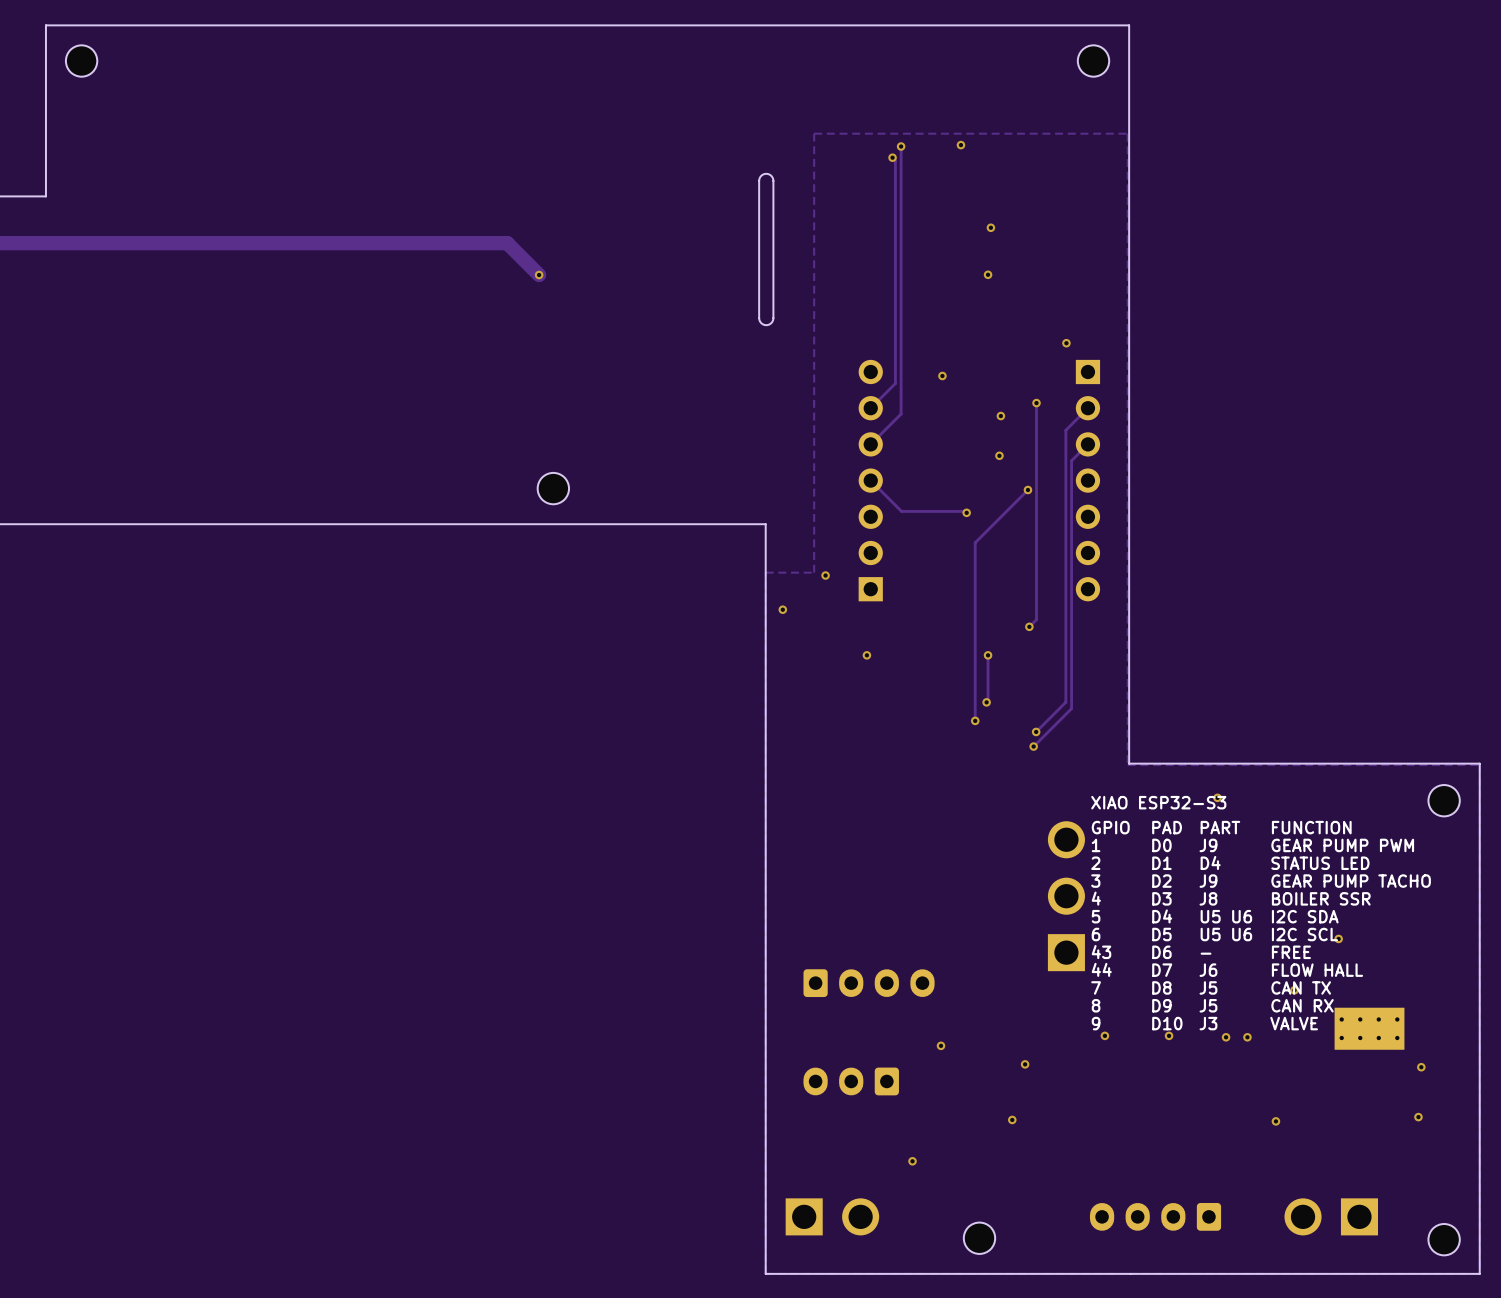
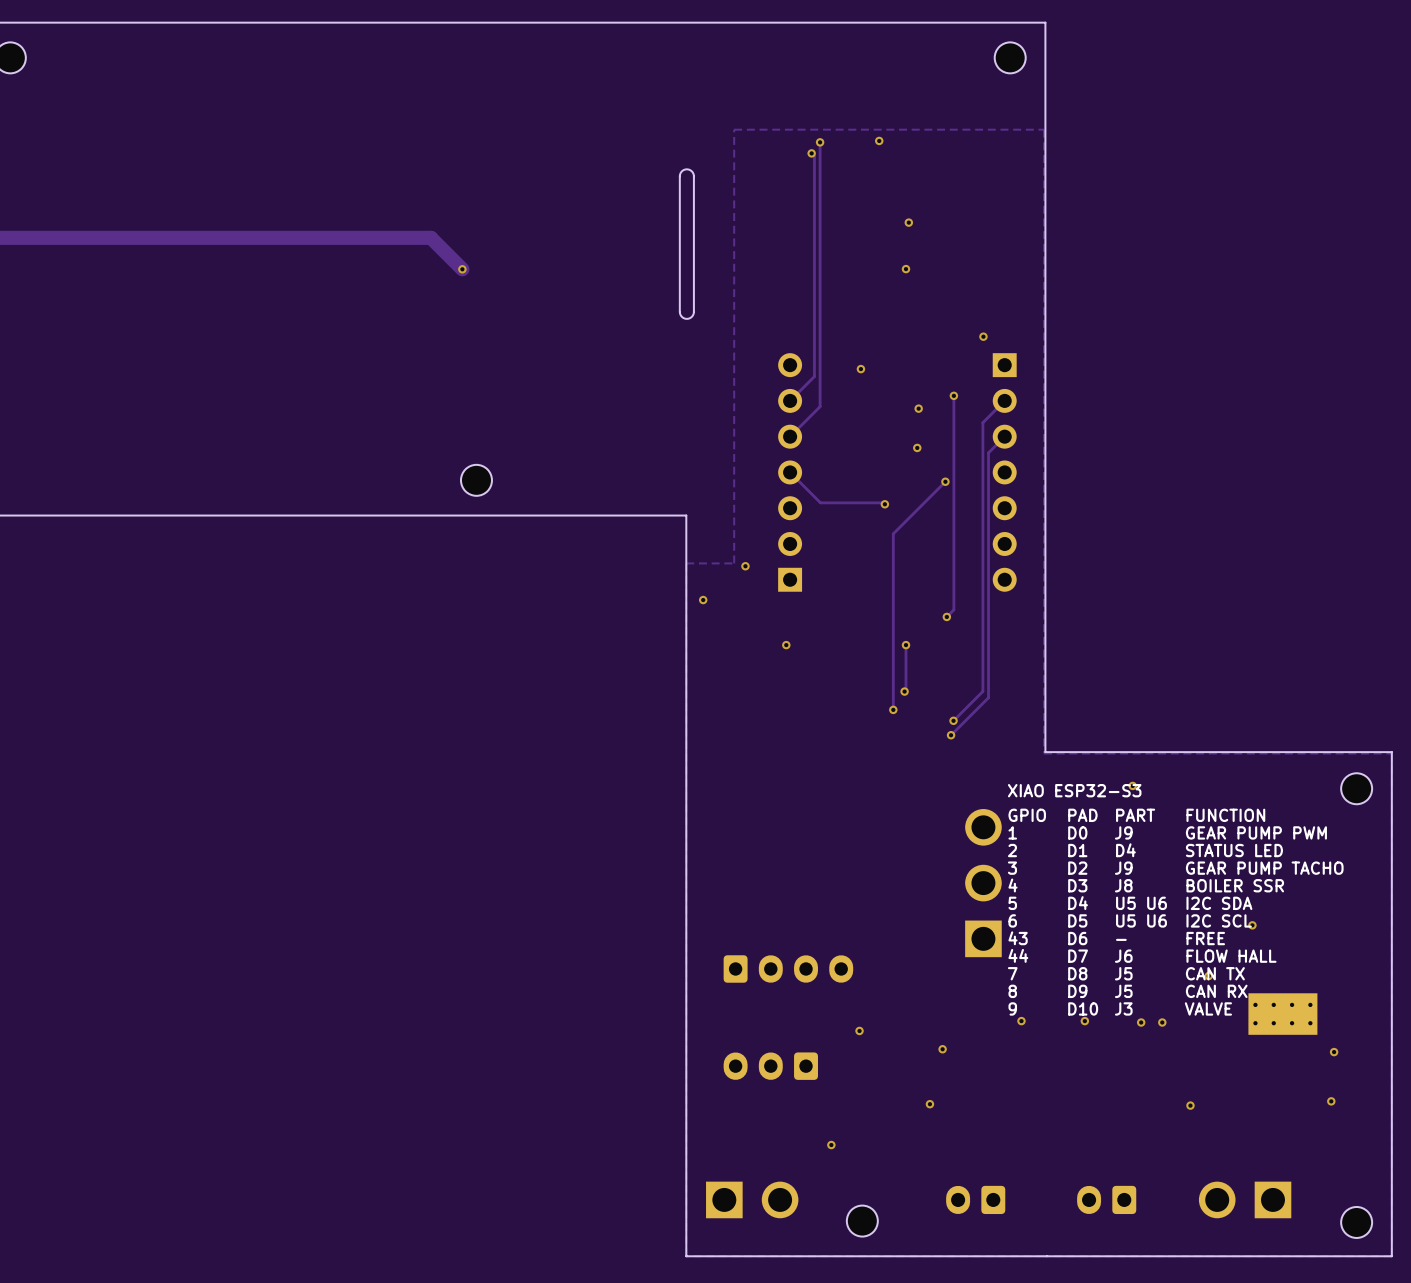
part: none -> (975, 1199)
part: (1155, 1216) -> none
part: none -> (1106, 1199)
part position: (979, 1238) -> (862, 1221)

